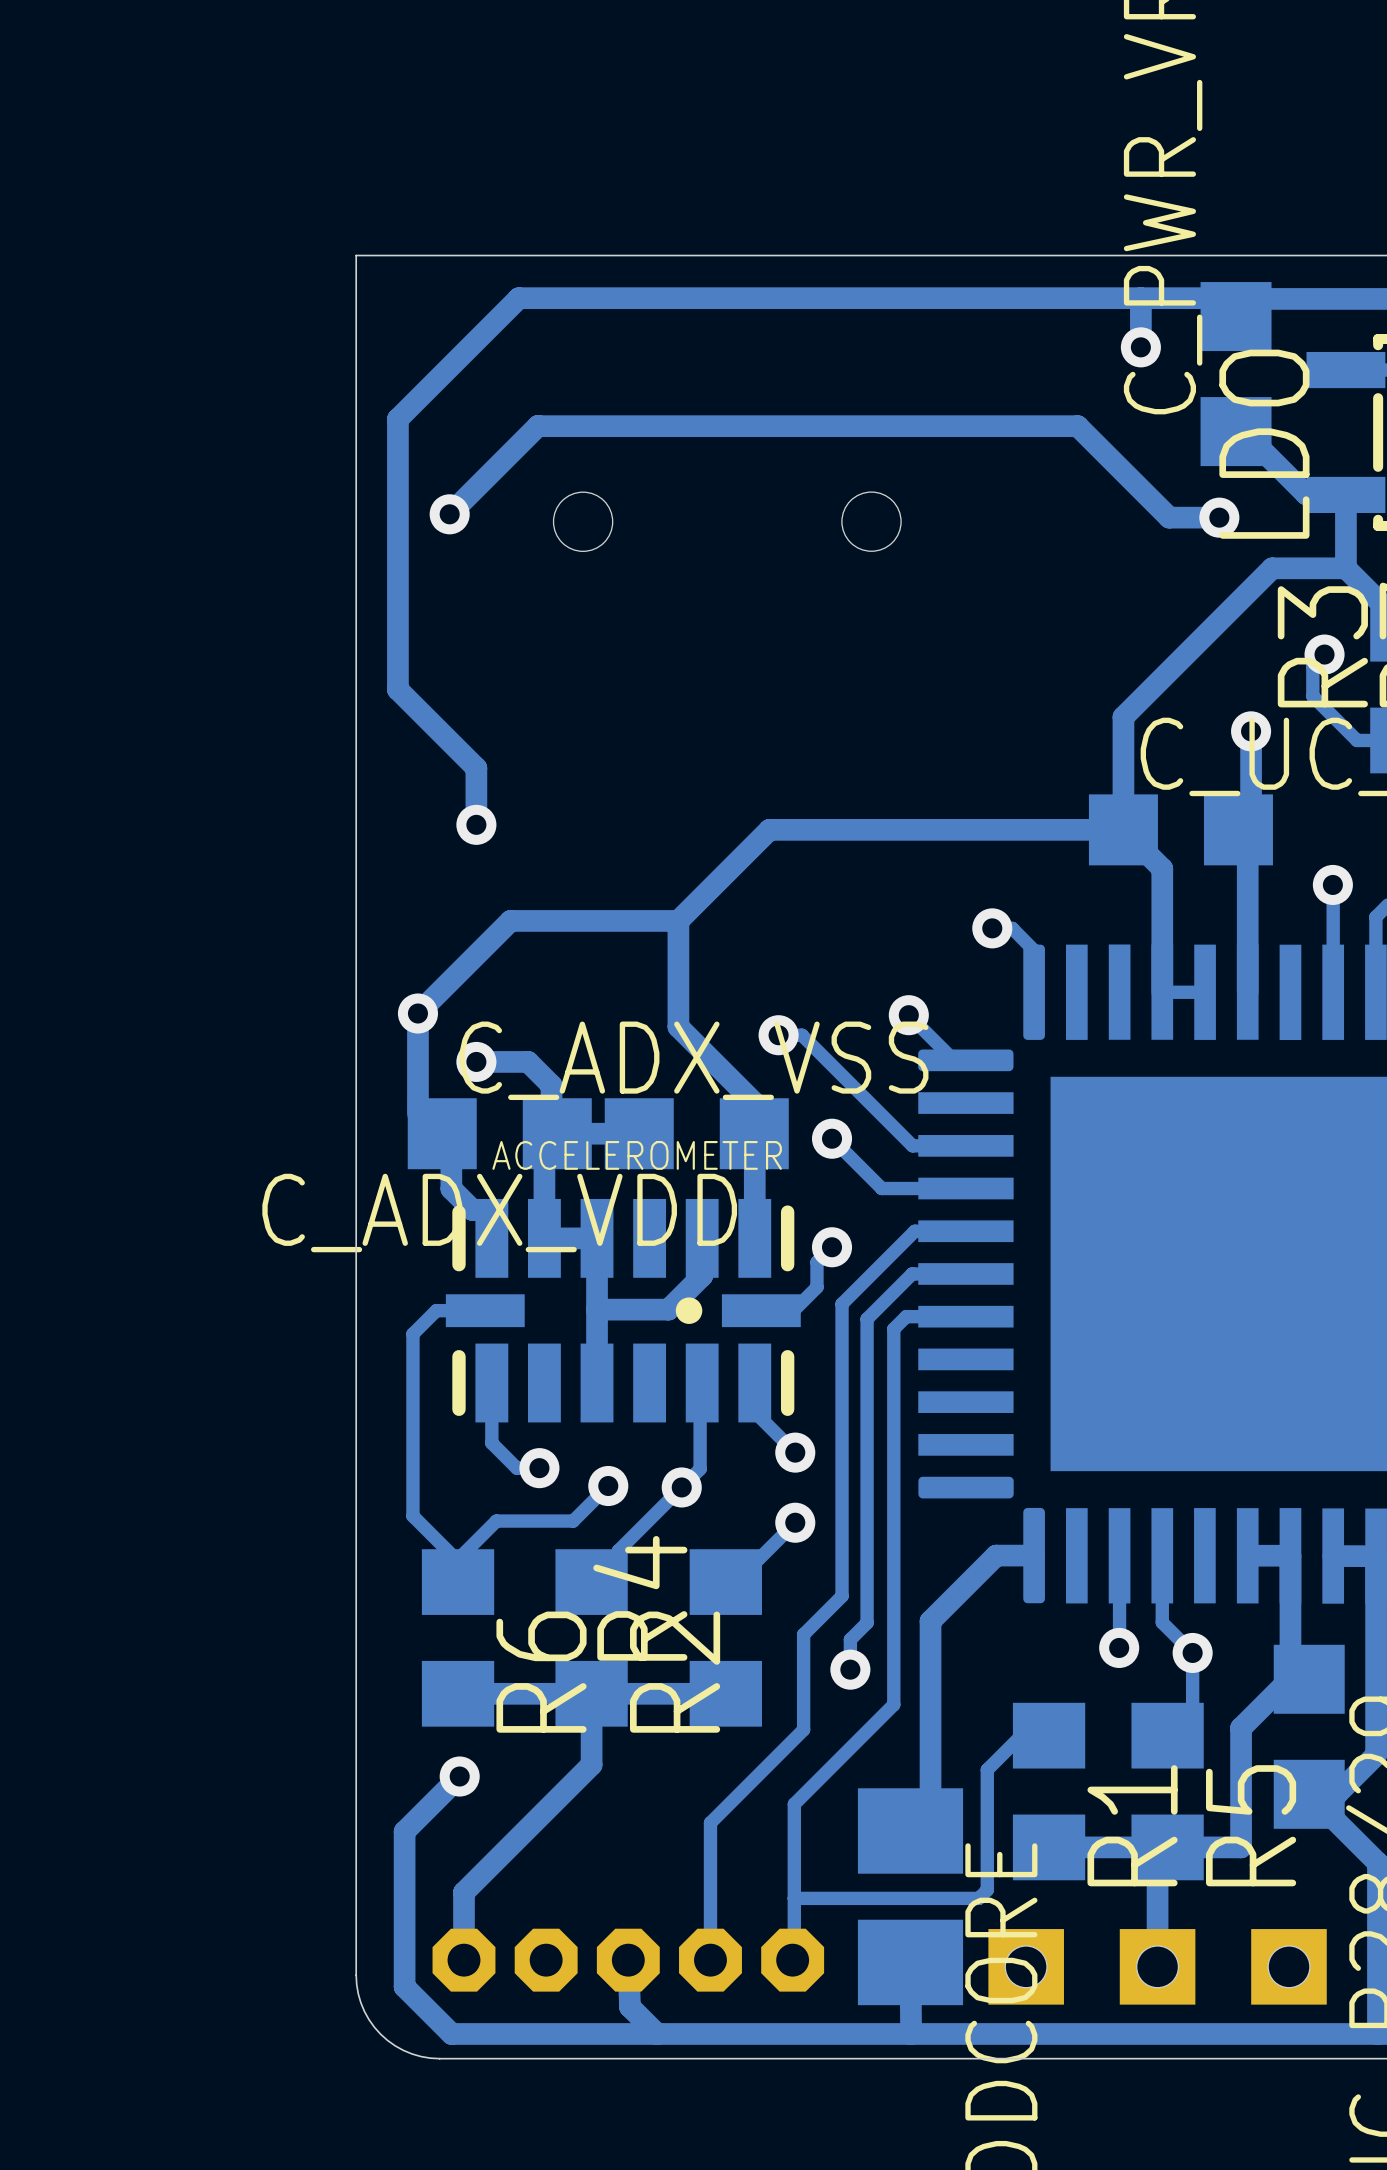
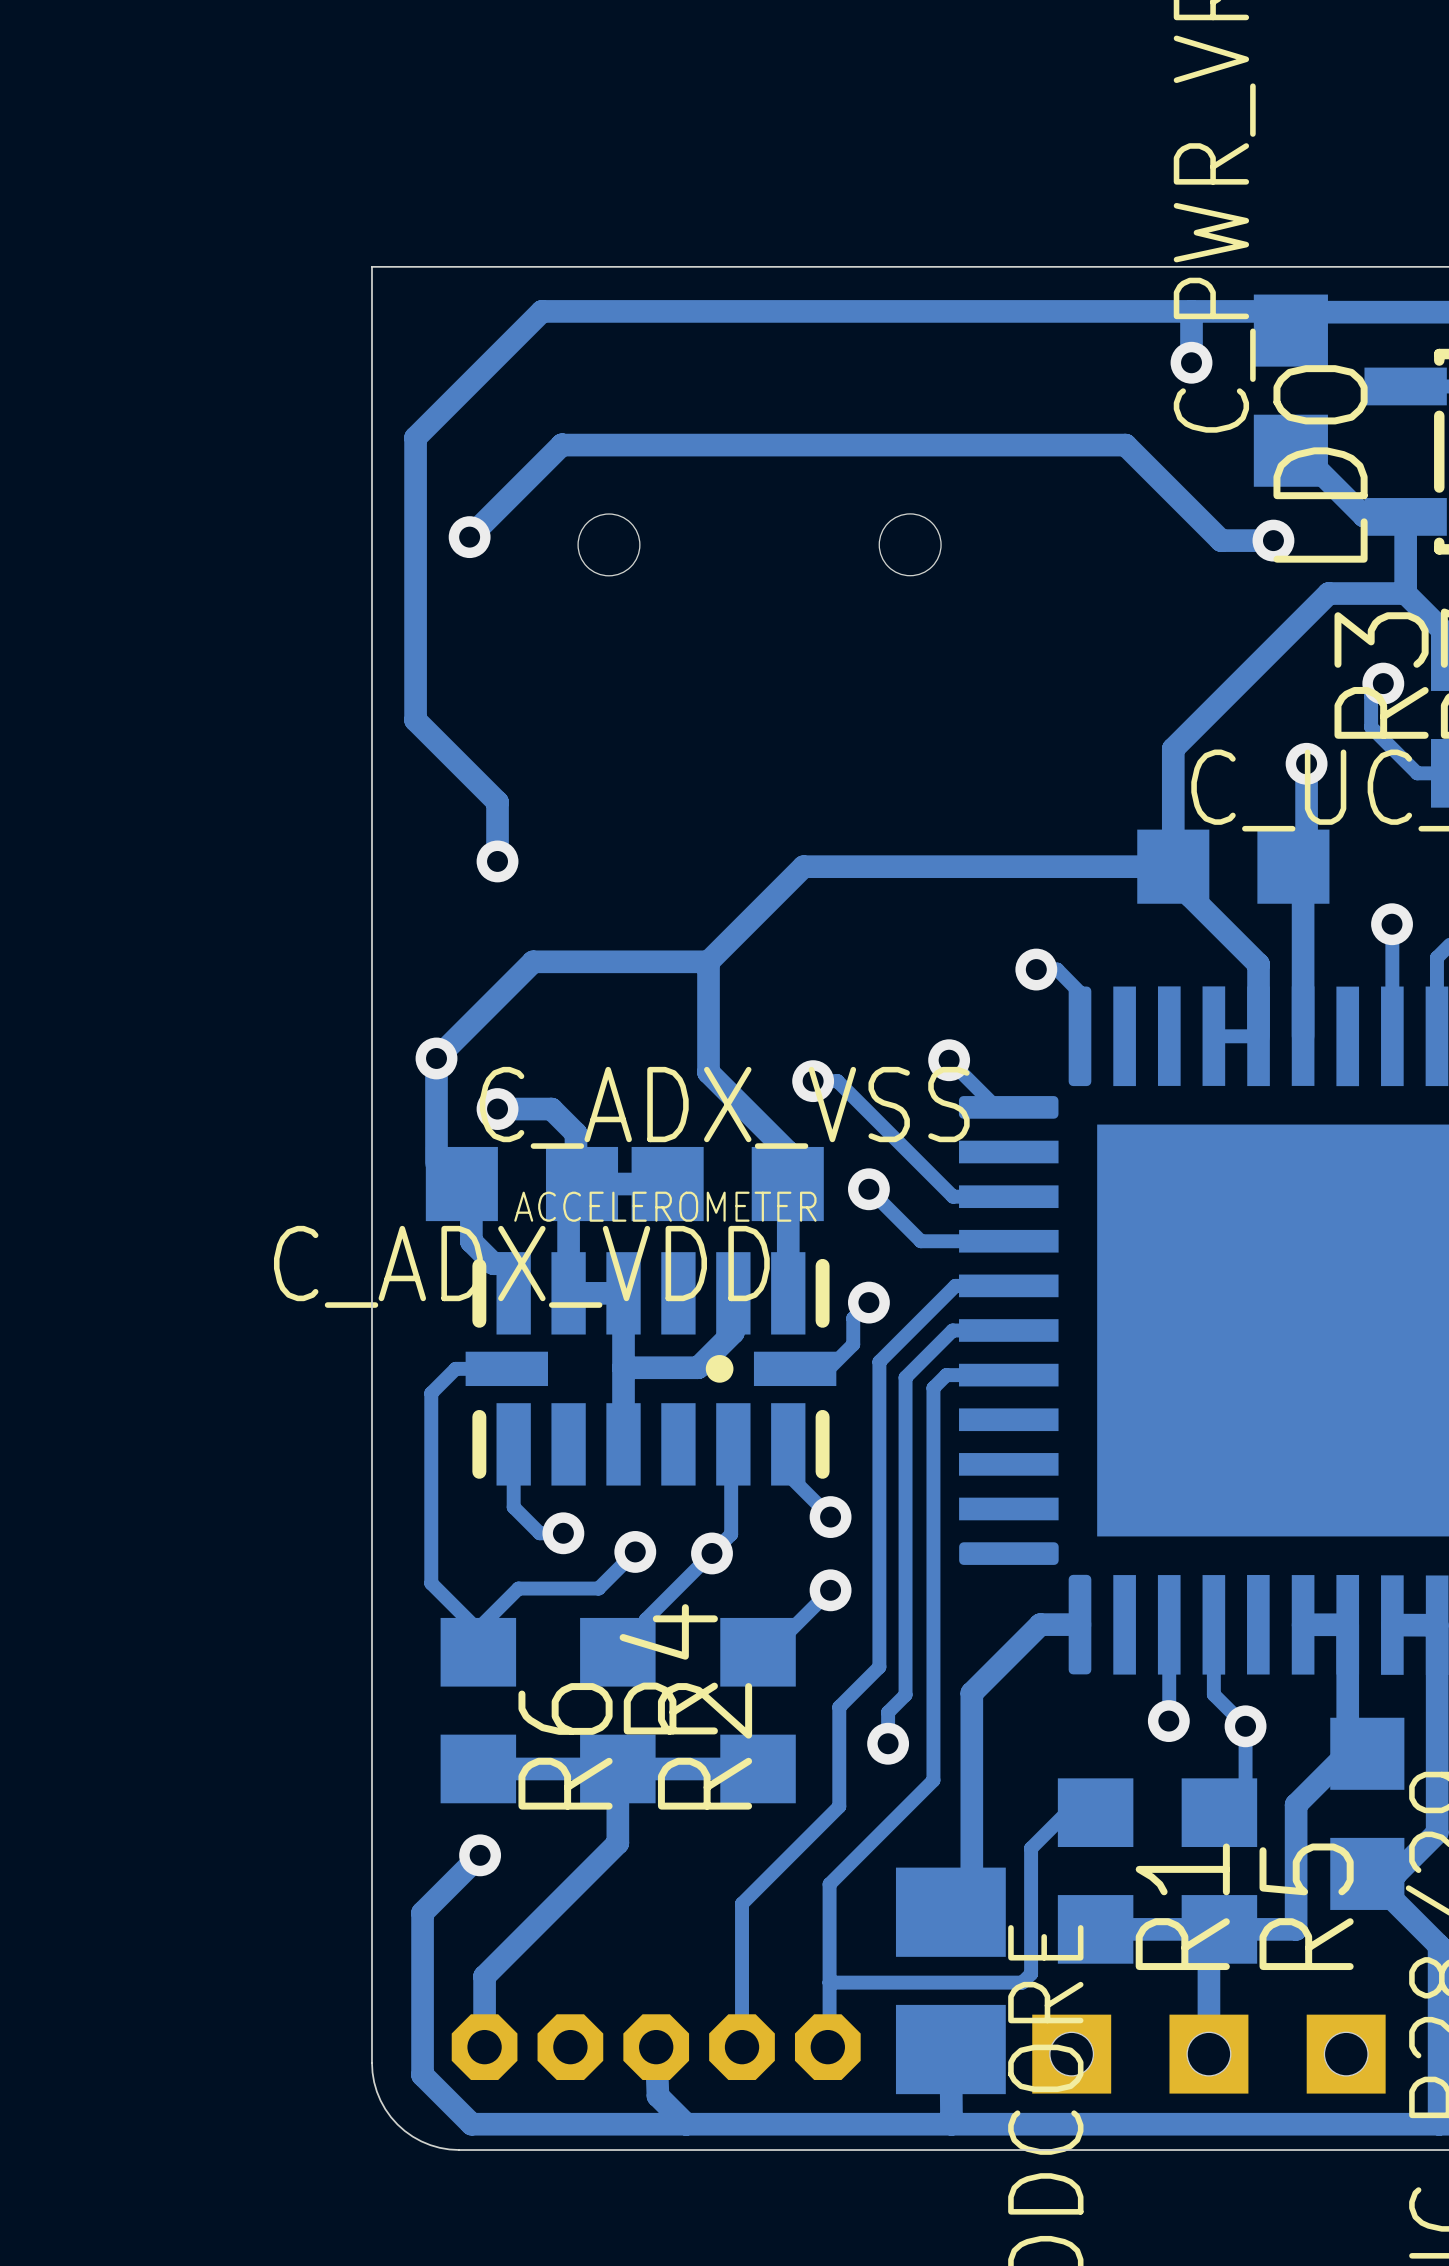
track: (1123, 829) (1162, 868) (1162, 992) -> (1173, 866) (1190, 896) (1258, 964) (1258, 1036)

